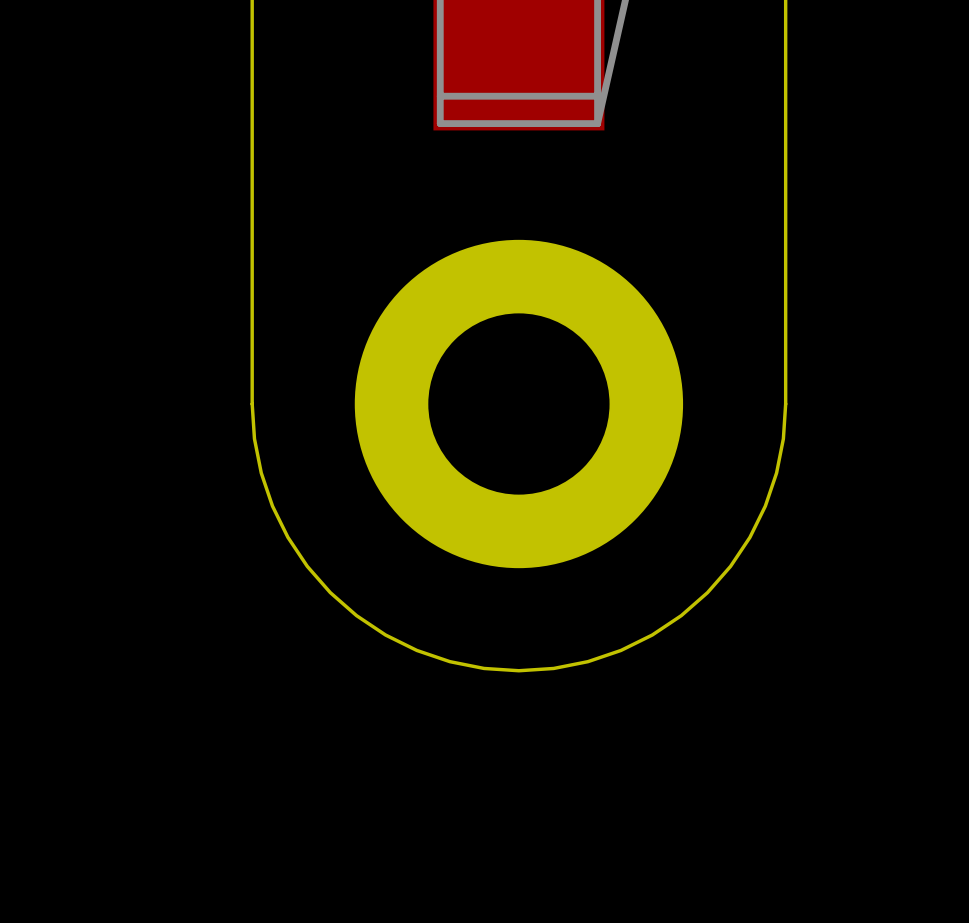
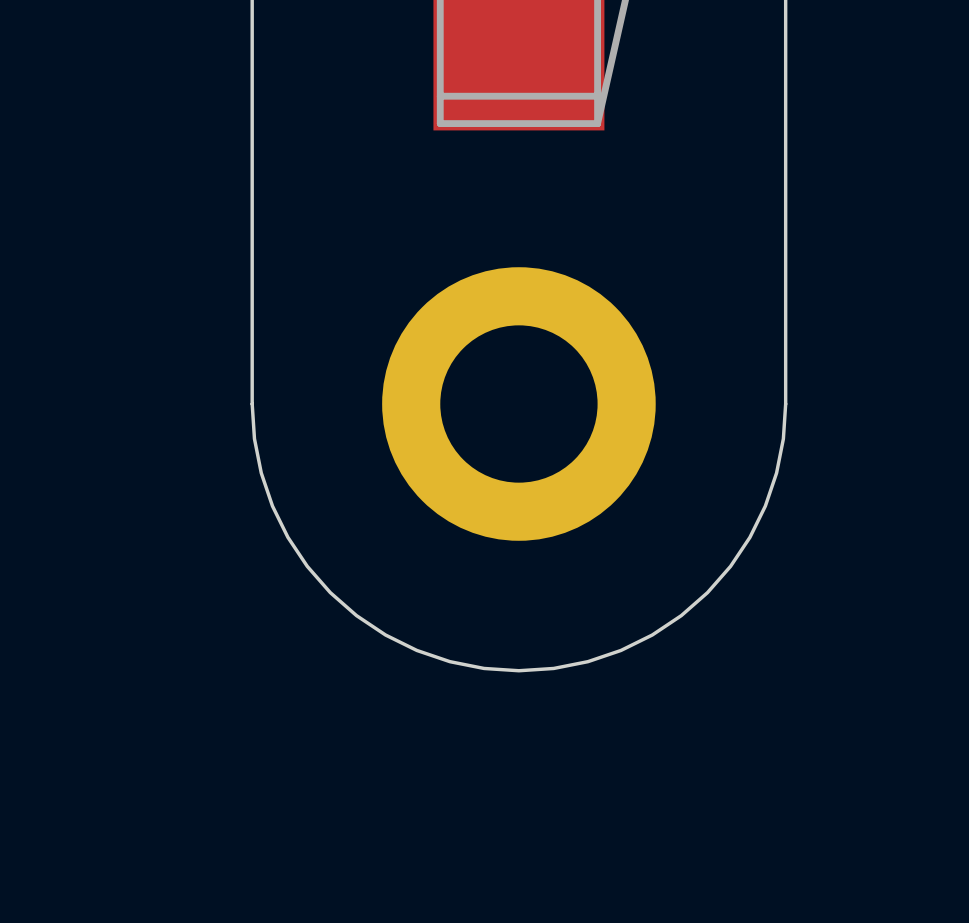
part footprint: [354, 239, 684, 569] -> [382, 267, 656, 541]

